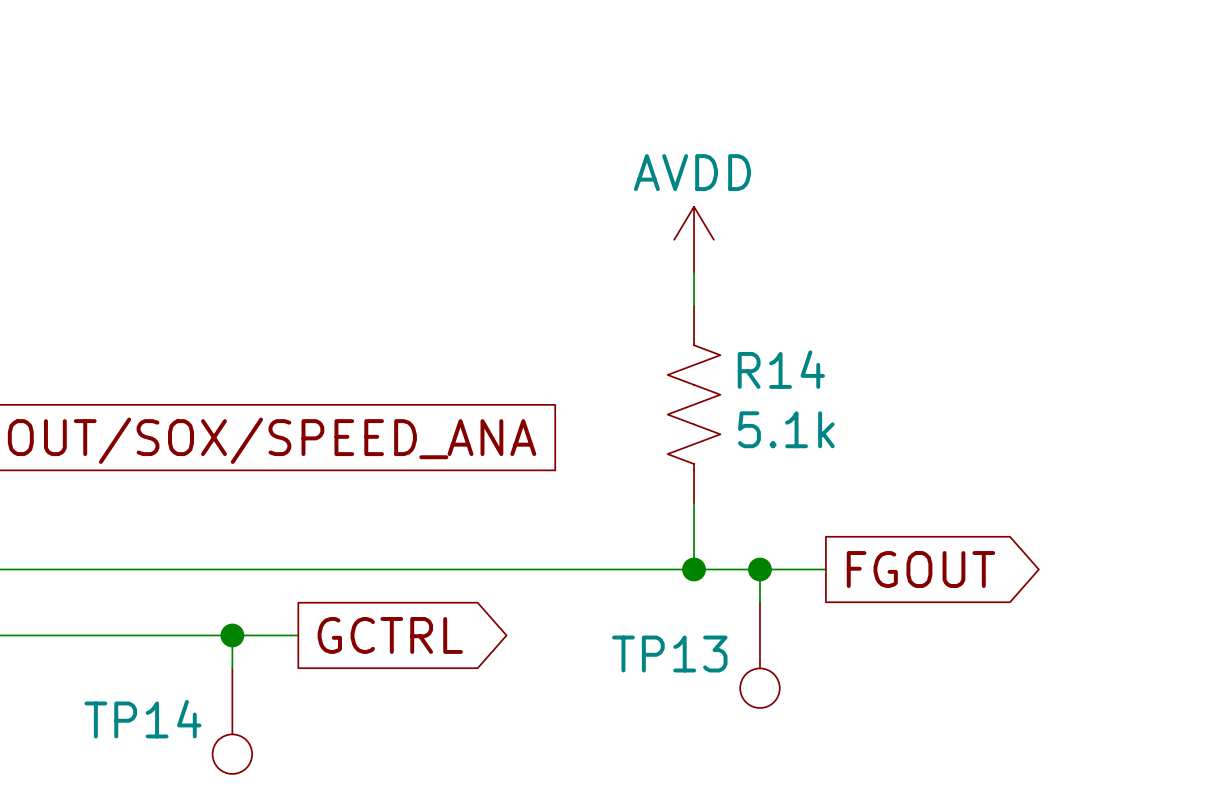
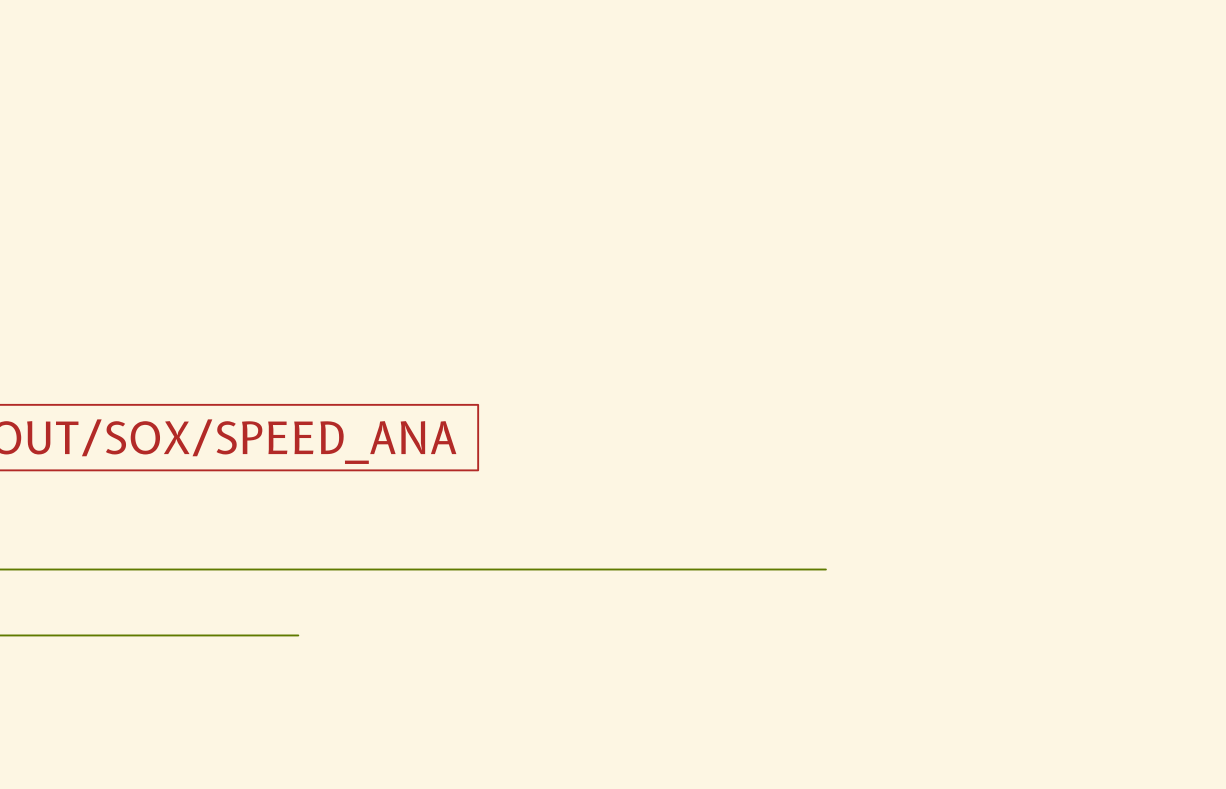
power symbol: AVDD (694, 239) -> none
wire: (694, 272) (694, 305) -> none
R14: 5.1k (694, 404) -> none
wire: (694, 503) (694, 569) -> none
junction: (694, 569) -> none
wire: (759, 569) (759, 602) -> none
junction: (759, 569) -> none
global label: FGOUT (920, 569) -> none
wire: (232, 635) (232, 668) -> none
junction: (232, 635) -> none
global label: GCTRL (390, 635) -> none
TP13: (759, 655) -> none
TP14: (232, 721) -> none

